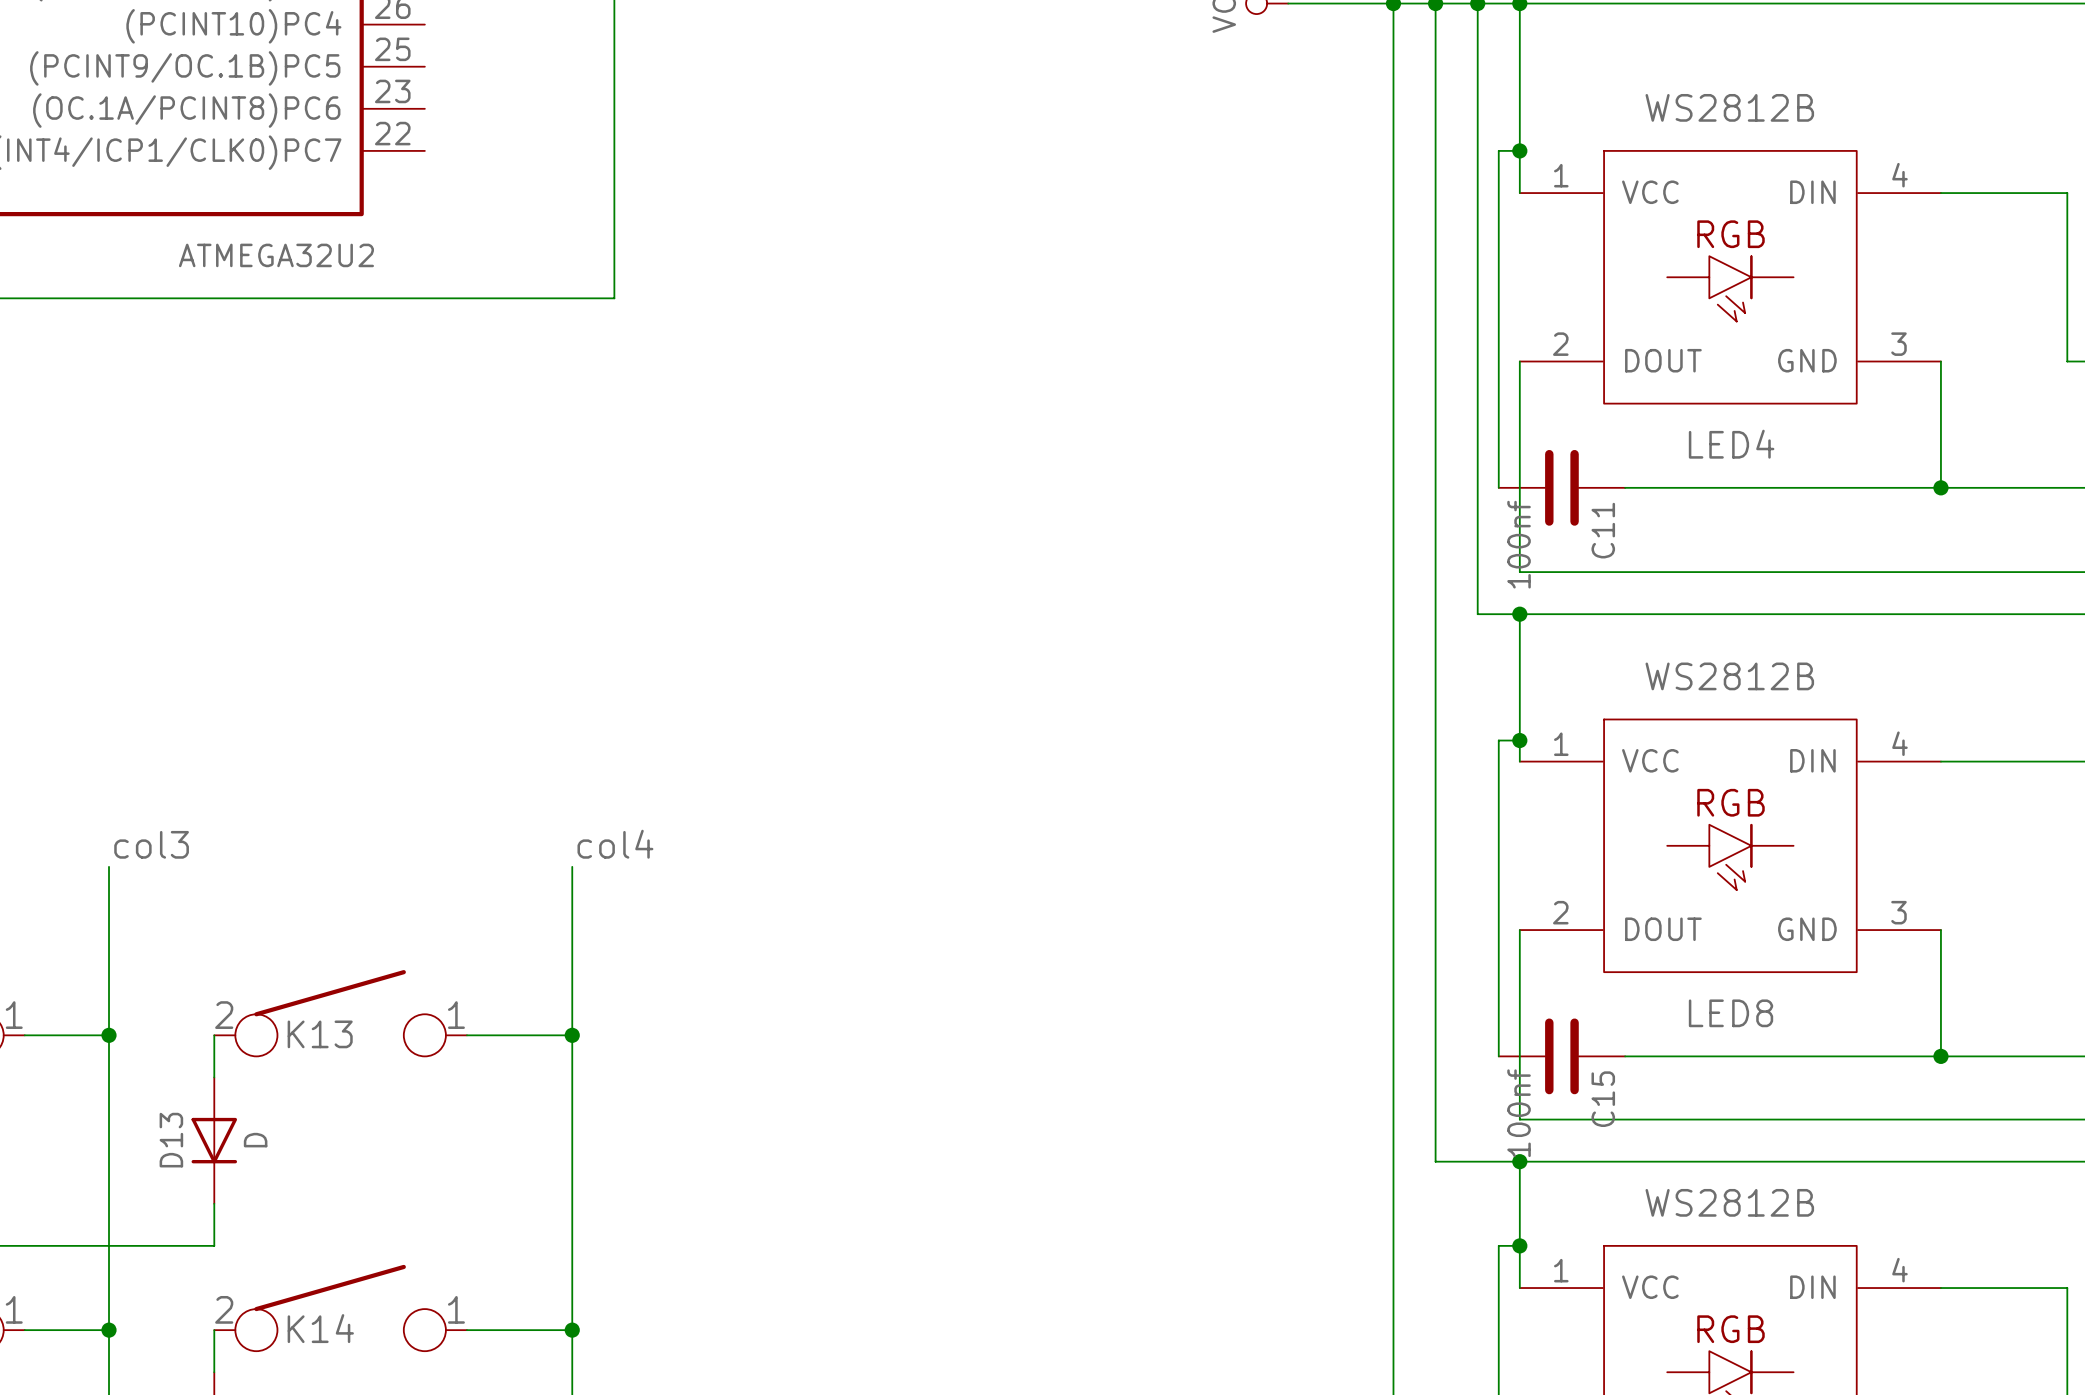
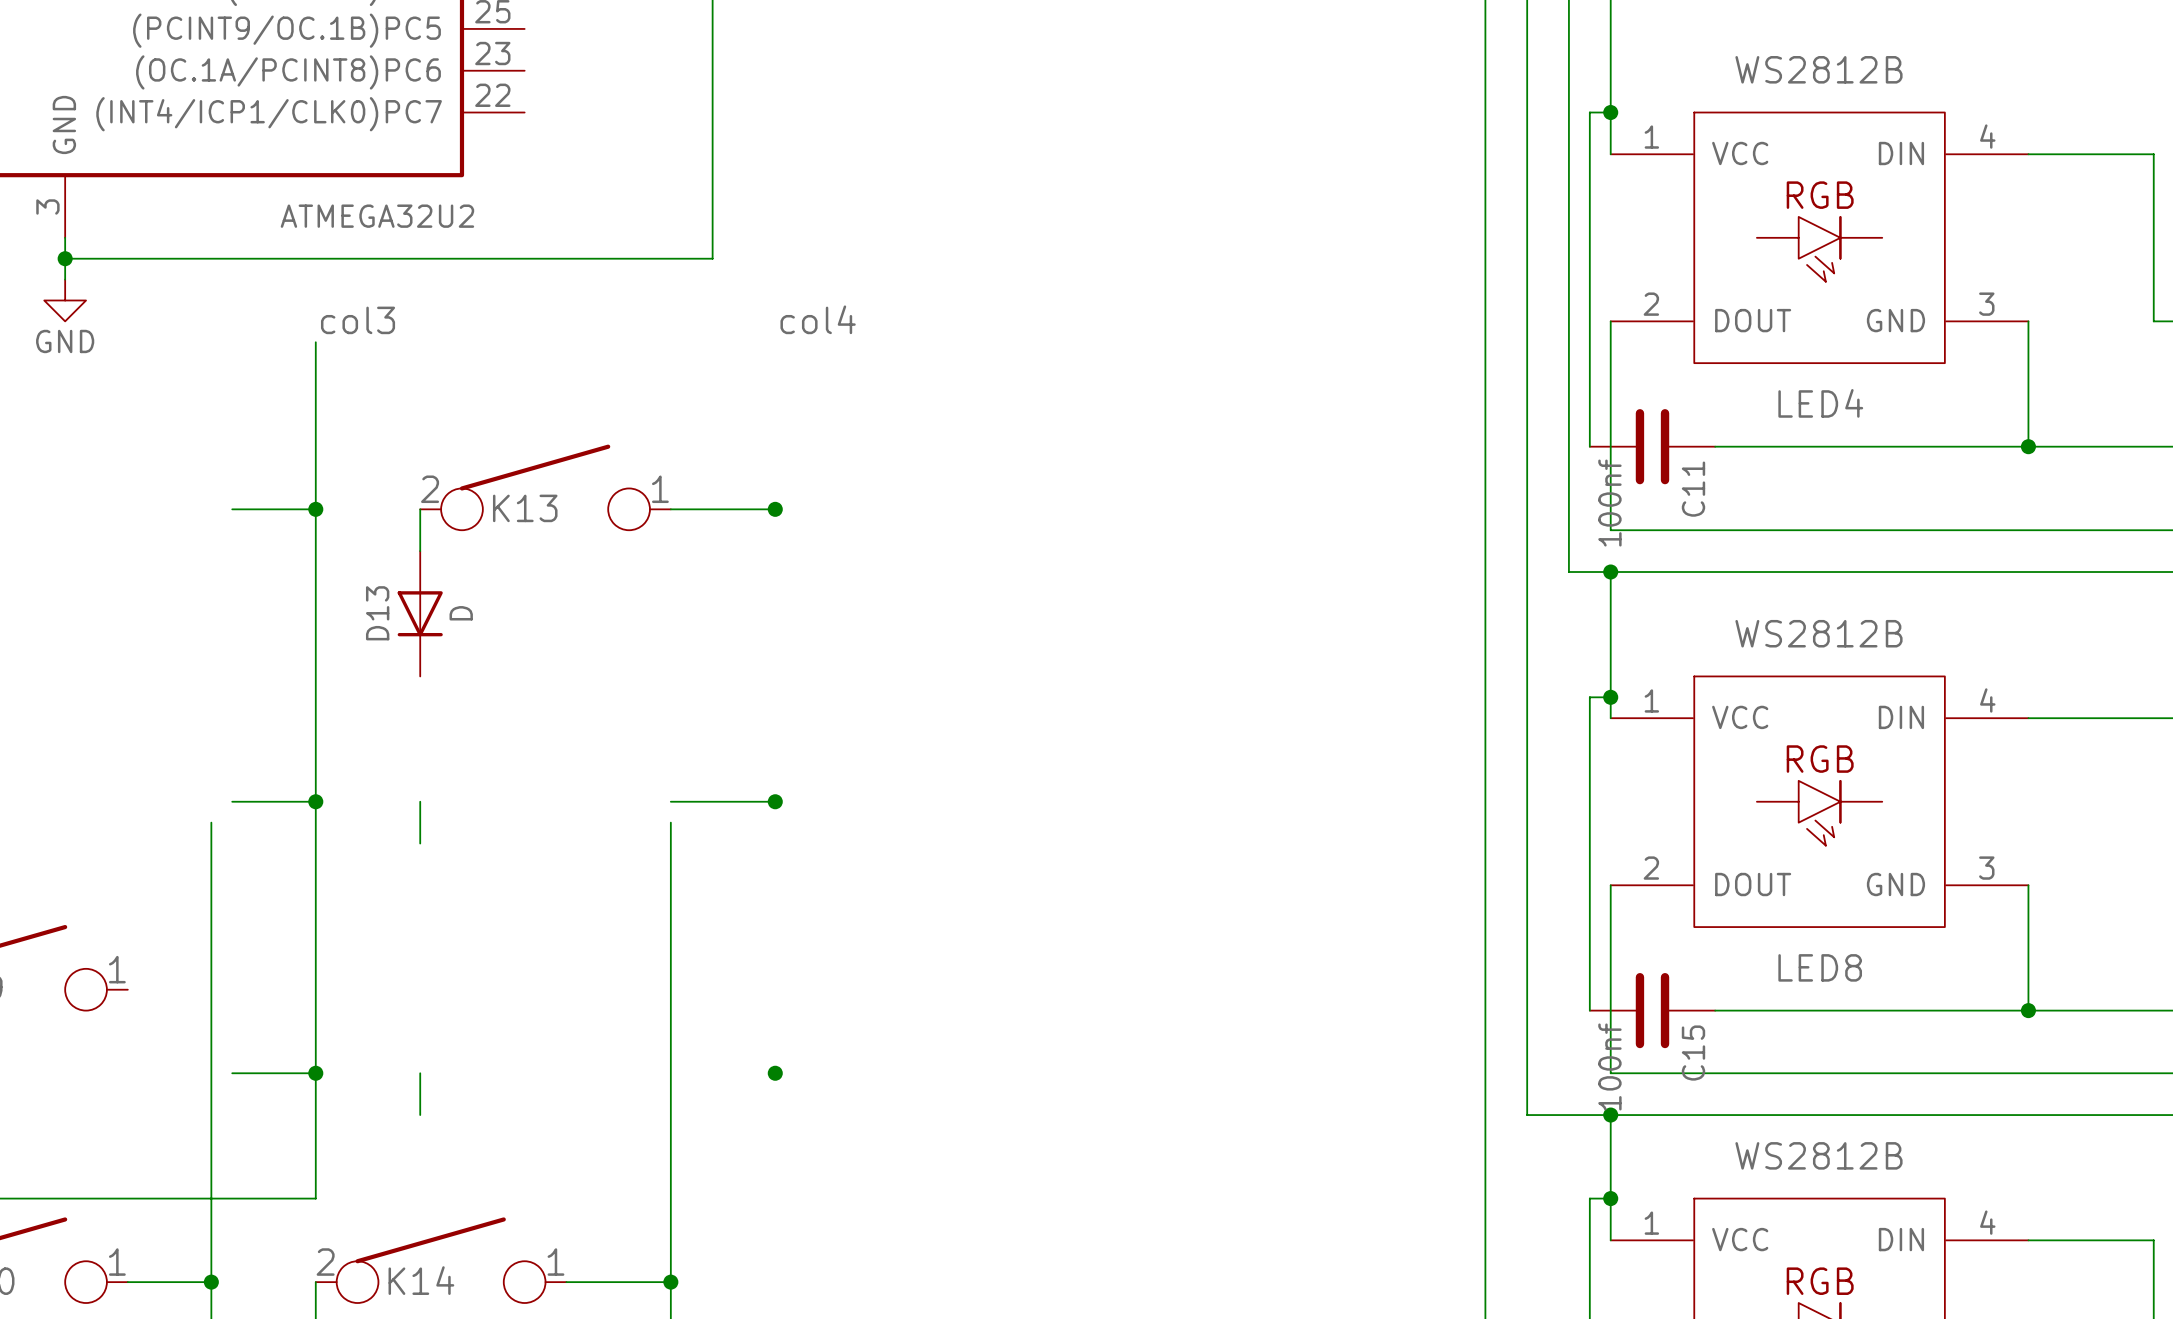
label: none -> col4 (818, 319)
label: none -> col3 (358, 320)
wire: none -> (315, 342) (315, 989)
wire: none -> (232, 509) (315, 509)
junction: none -> (315, 509)
wire: none -> (420, 509) (420, 551)
wire: none -> (670, 509) (775, 509)
junction: none -> (775, 509)
label: col3 (151, 844) -> none
label: col4 (615, 844) -> none
junction: none -> (315, 801)
wire: none -> (420, 801) (420, 843)
junction: none -> (775, 801)
K13 position: (340, 1013) -> (545, 487)
wire: (24, 1035) (109, 1035) -> (232, 801) (315, 801)
junction: (109, 1035) -> none
wire: (466, 1035) (572, 1035) -> (670, 801) (775, 801)
junction: (572, 1035) -> none
wire: none -> (232, 1073) (315, 1073)
junction: none -> (315, 1073)
wire: none -> (420, 1073) (420, 1115)
junction: none -> (775, 1073)
D13 position: (214, 1140) -> (420, 613)

